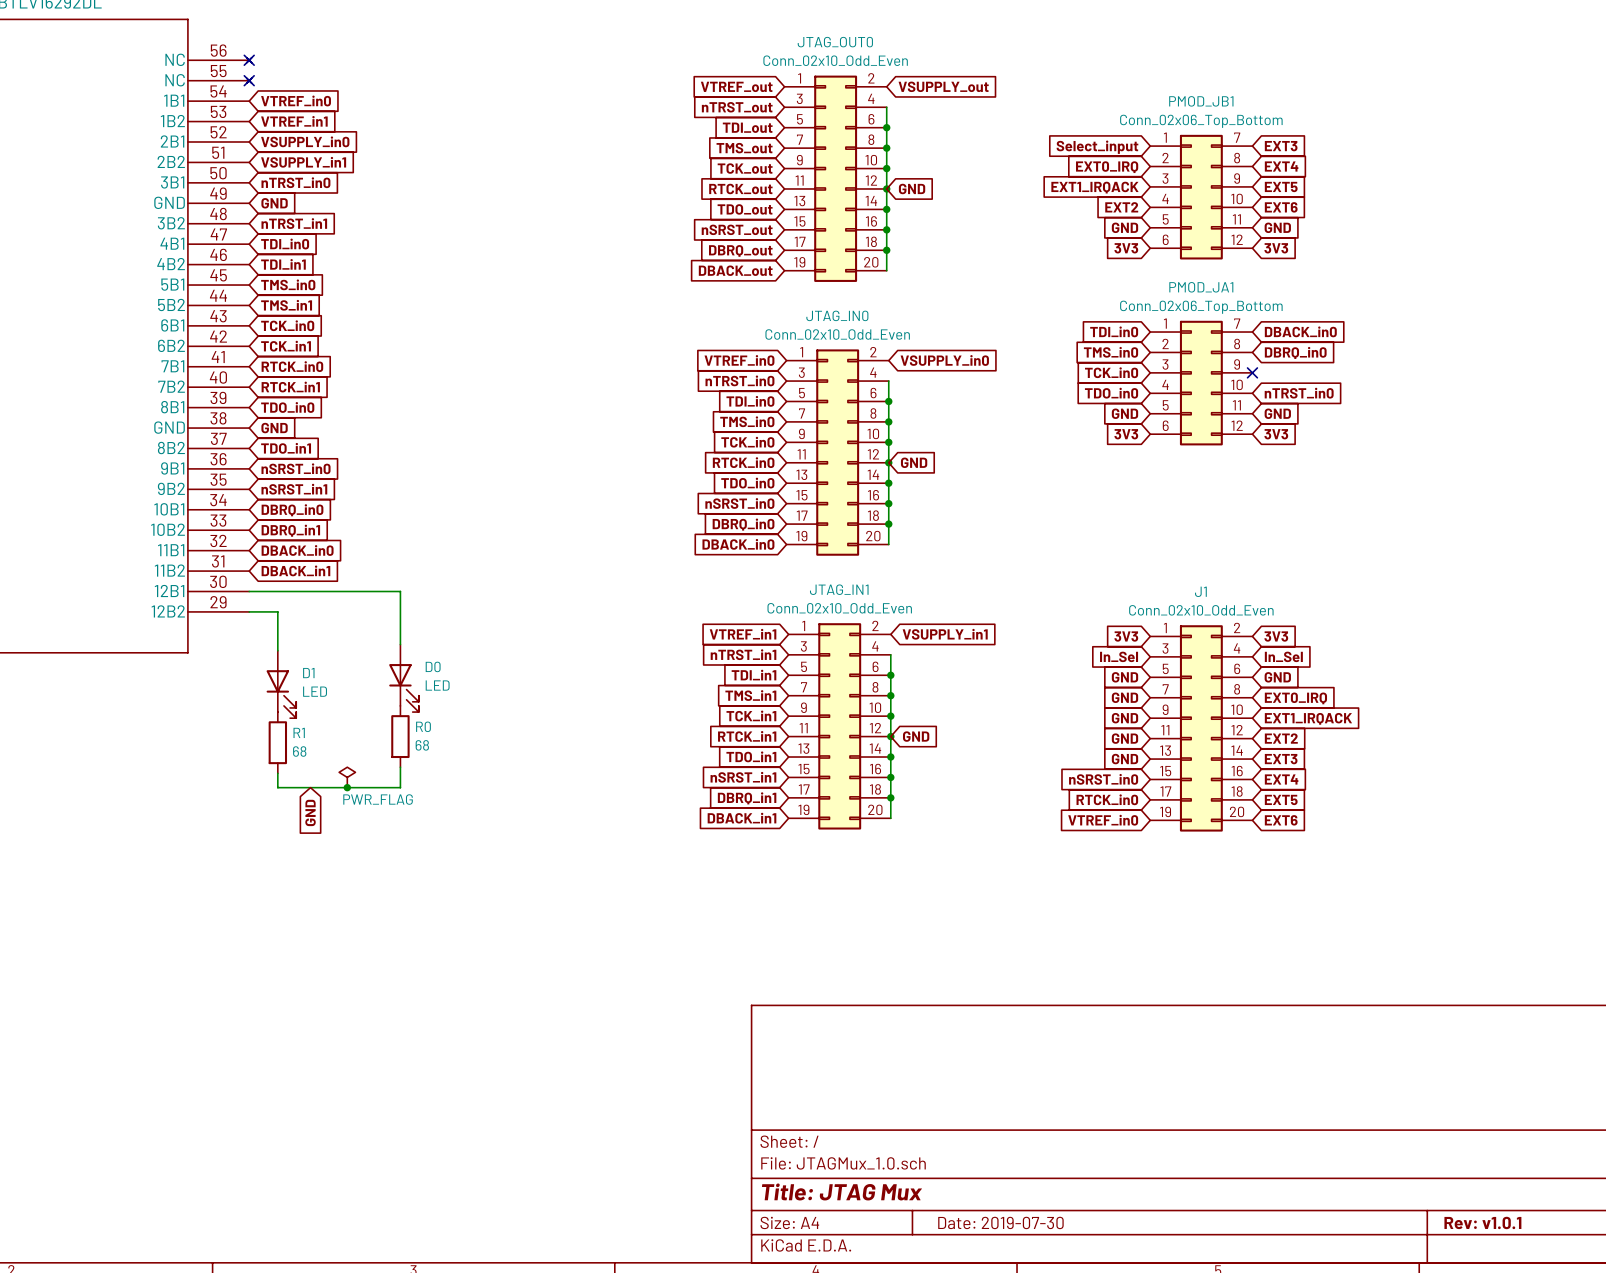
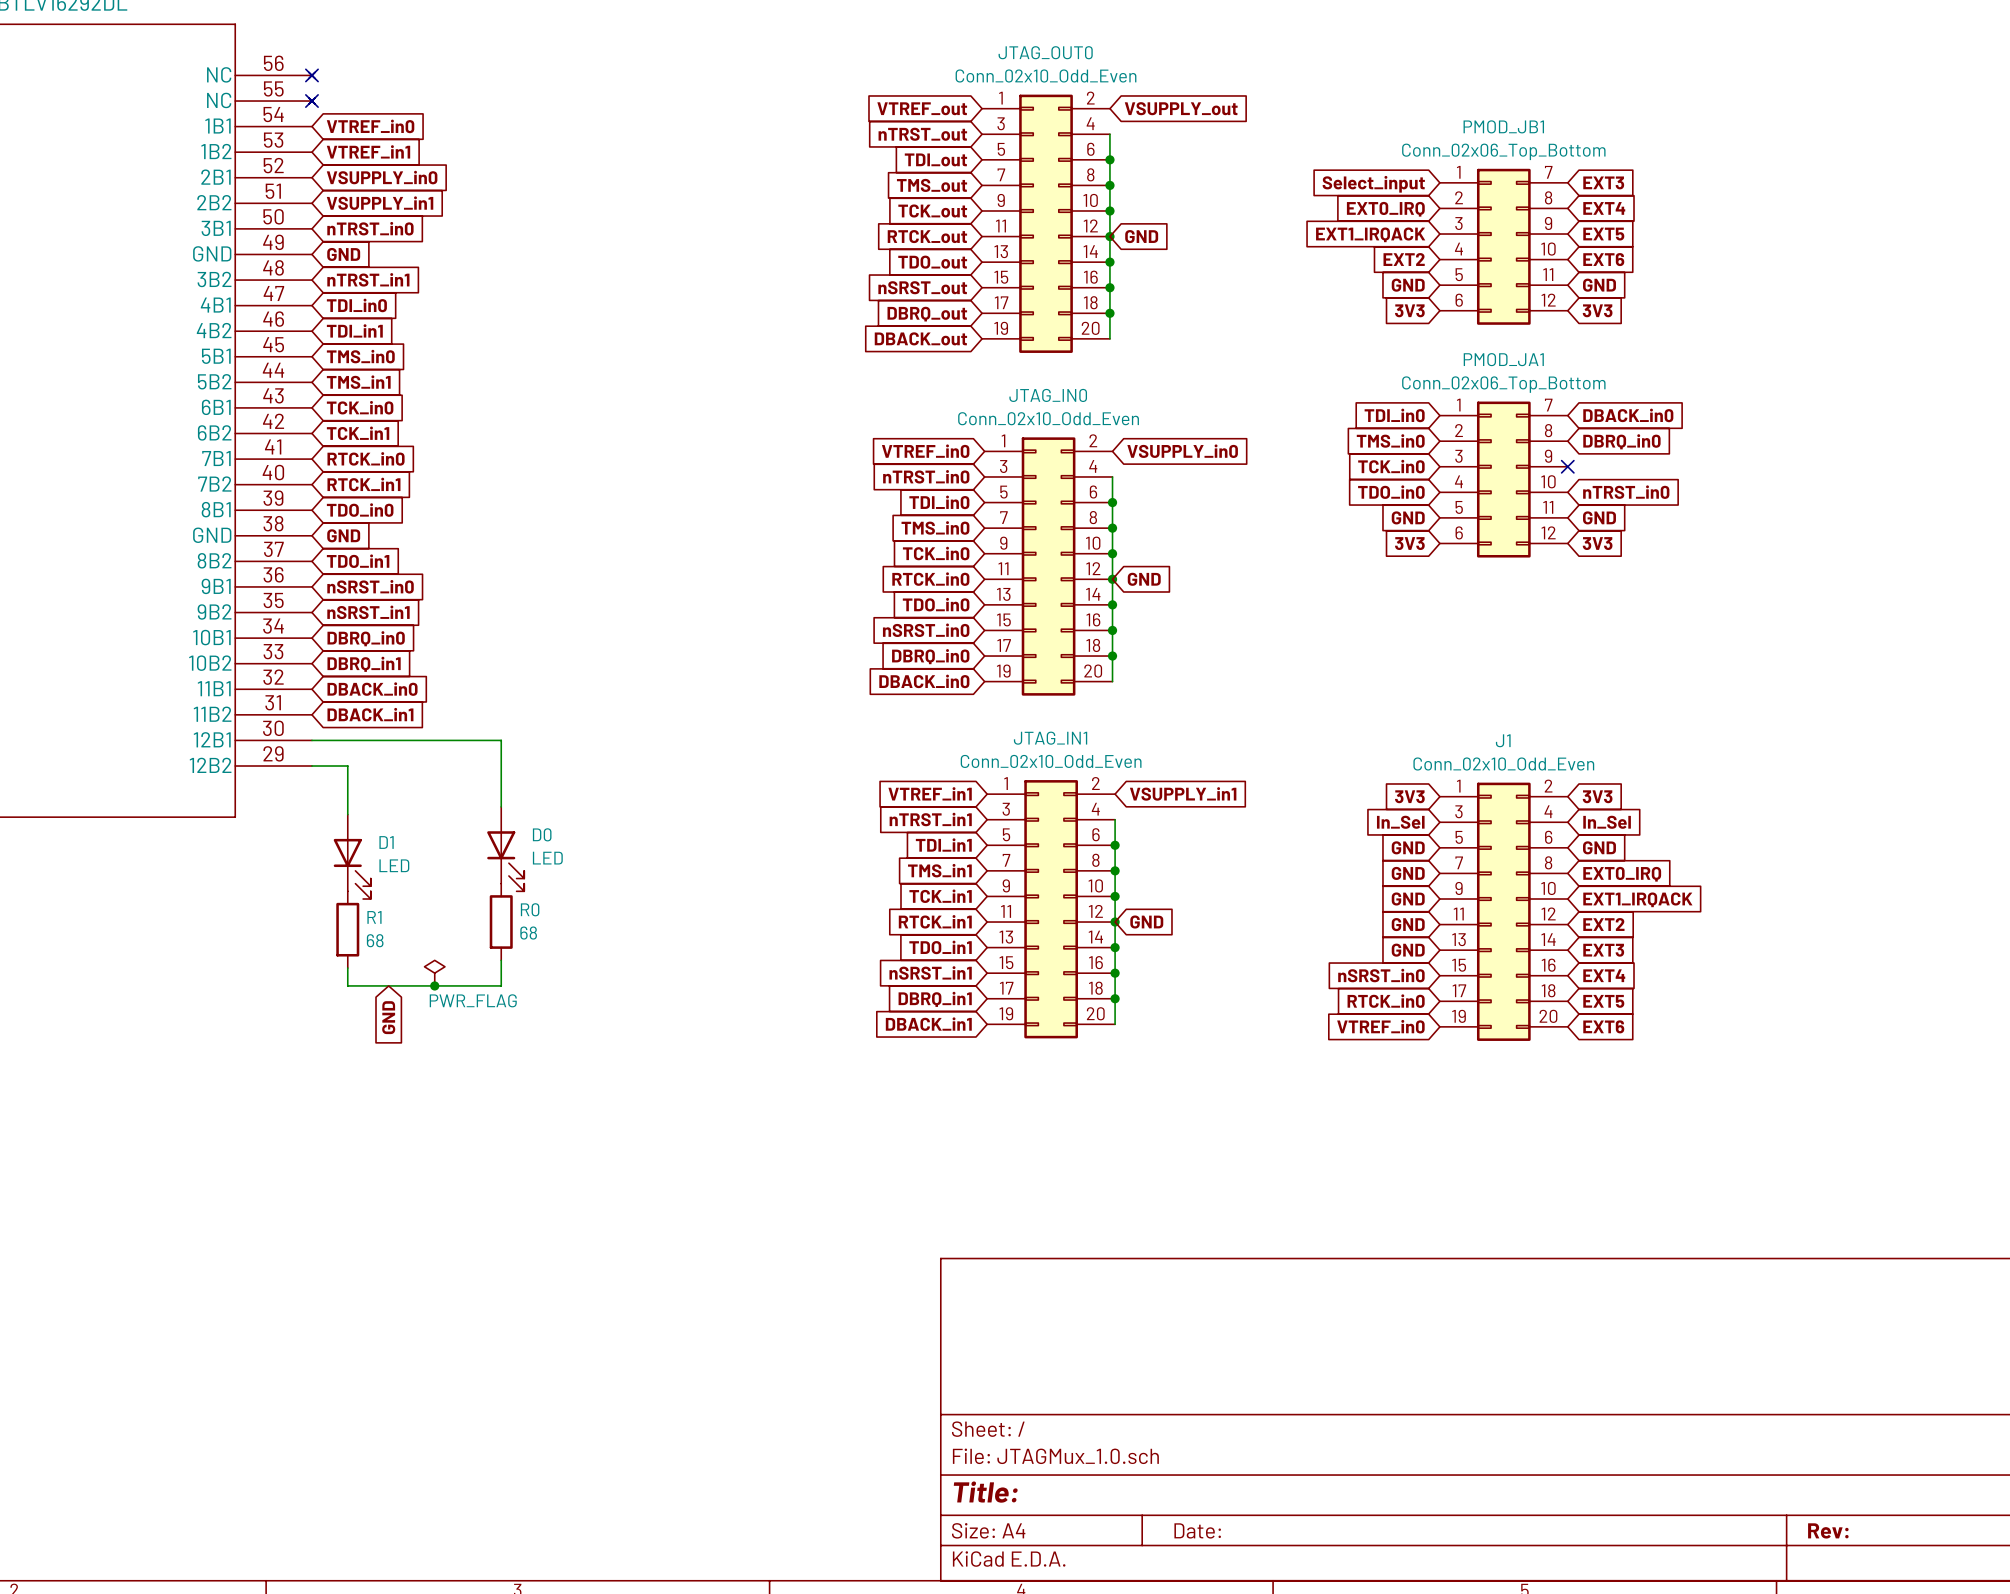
title block: Title: JTAG Mux (841, 1191) -> Title: (985, 1492)
title block: Date: 2019-07-30 (1000, 1222) -> Date: (1197, 1530)
title block: Rev: v1.0.1 (1482, 1222) -> Rev: (1828, 1530)

